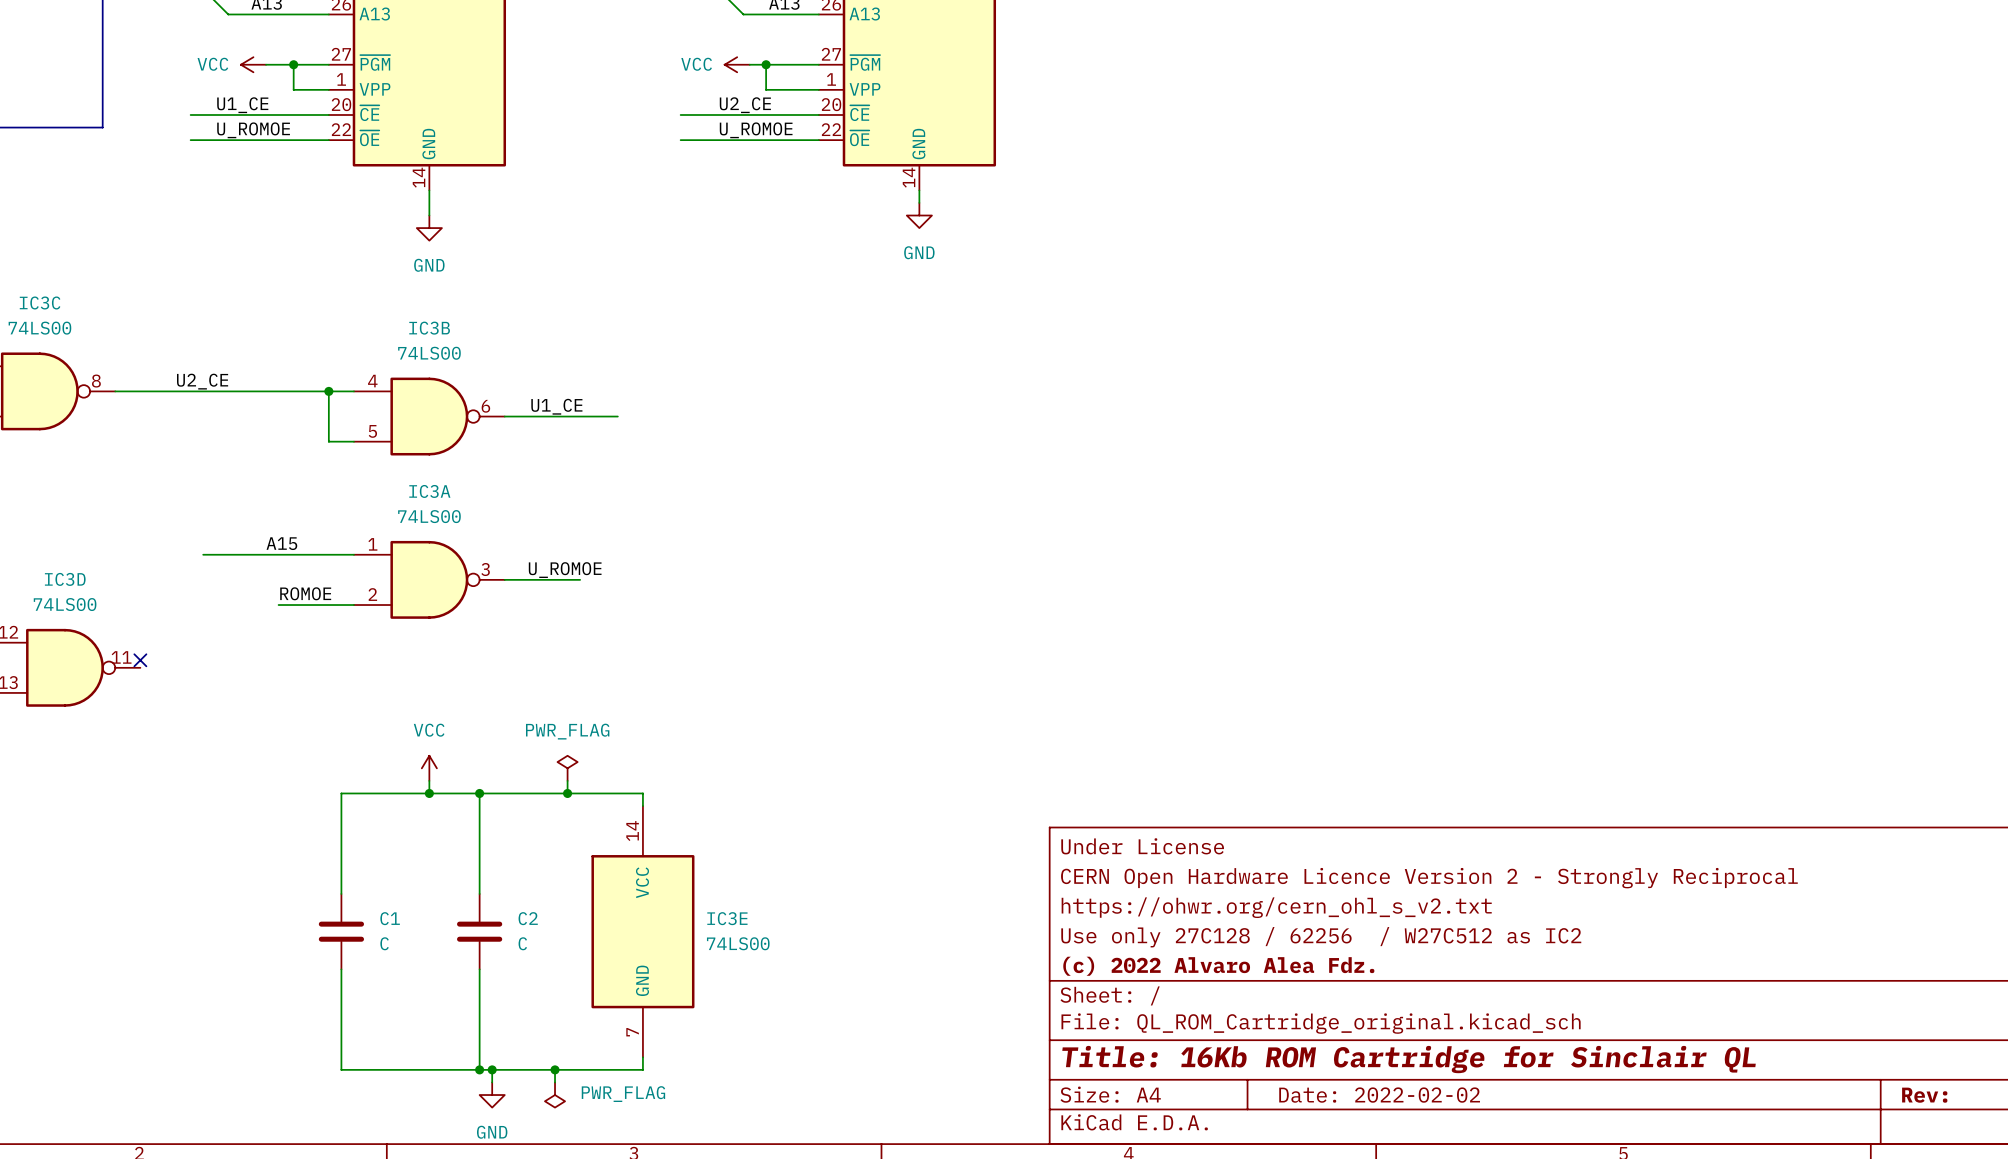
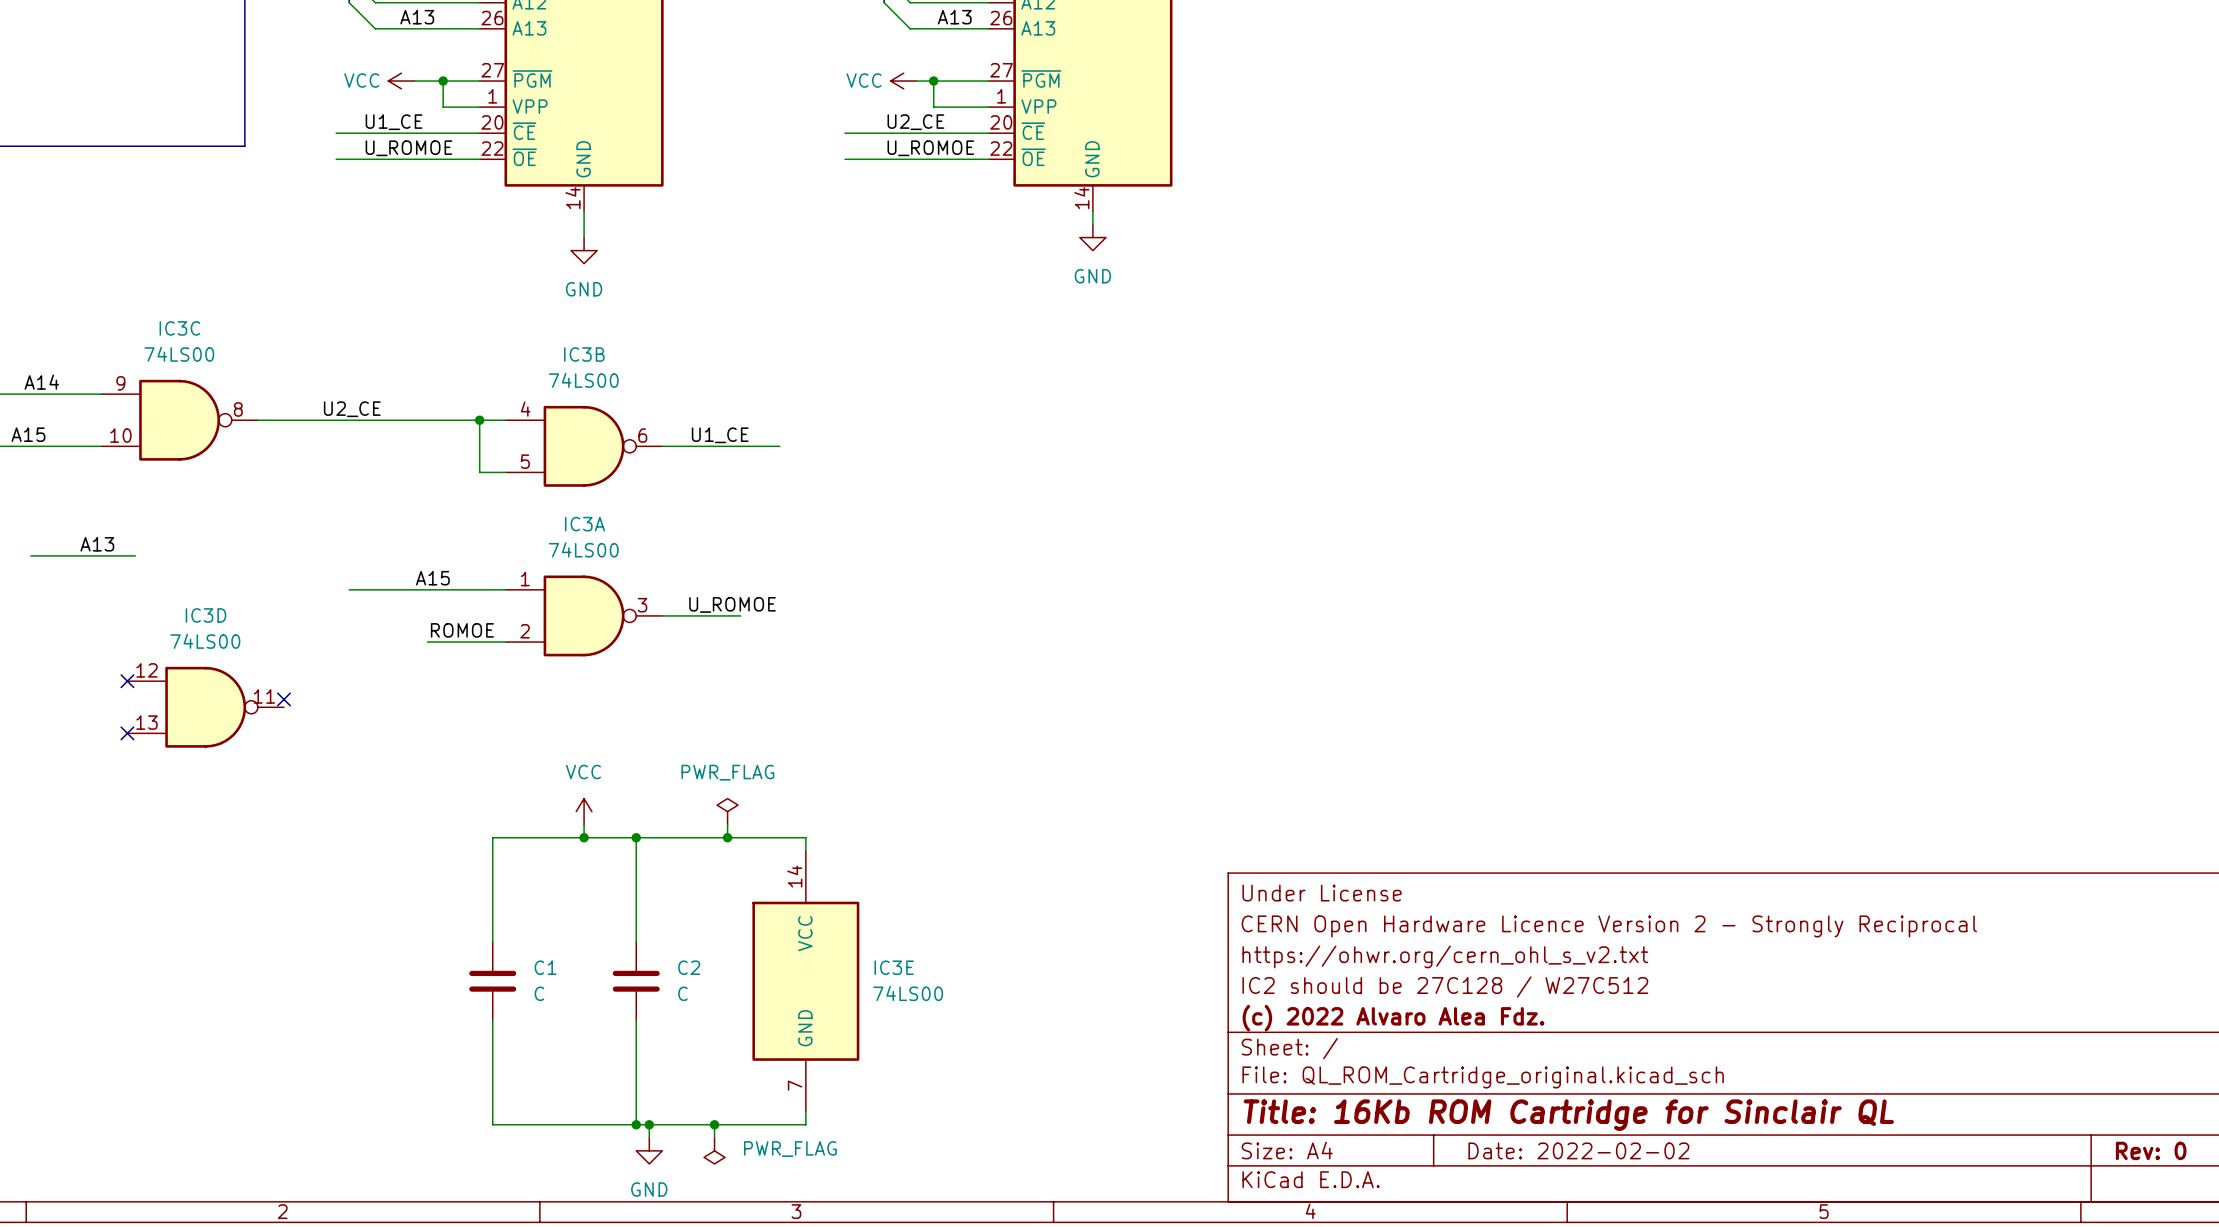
title block: Use only 27C128 / 62256 / W27C512 as IC2 (1321, 937) -> IC2 should be 27C128 / W27C512 (1445, 986)
title block: Rev: (1924, 1095) -> Rev: 0 (2151, 1150)

